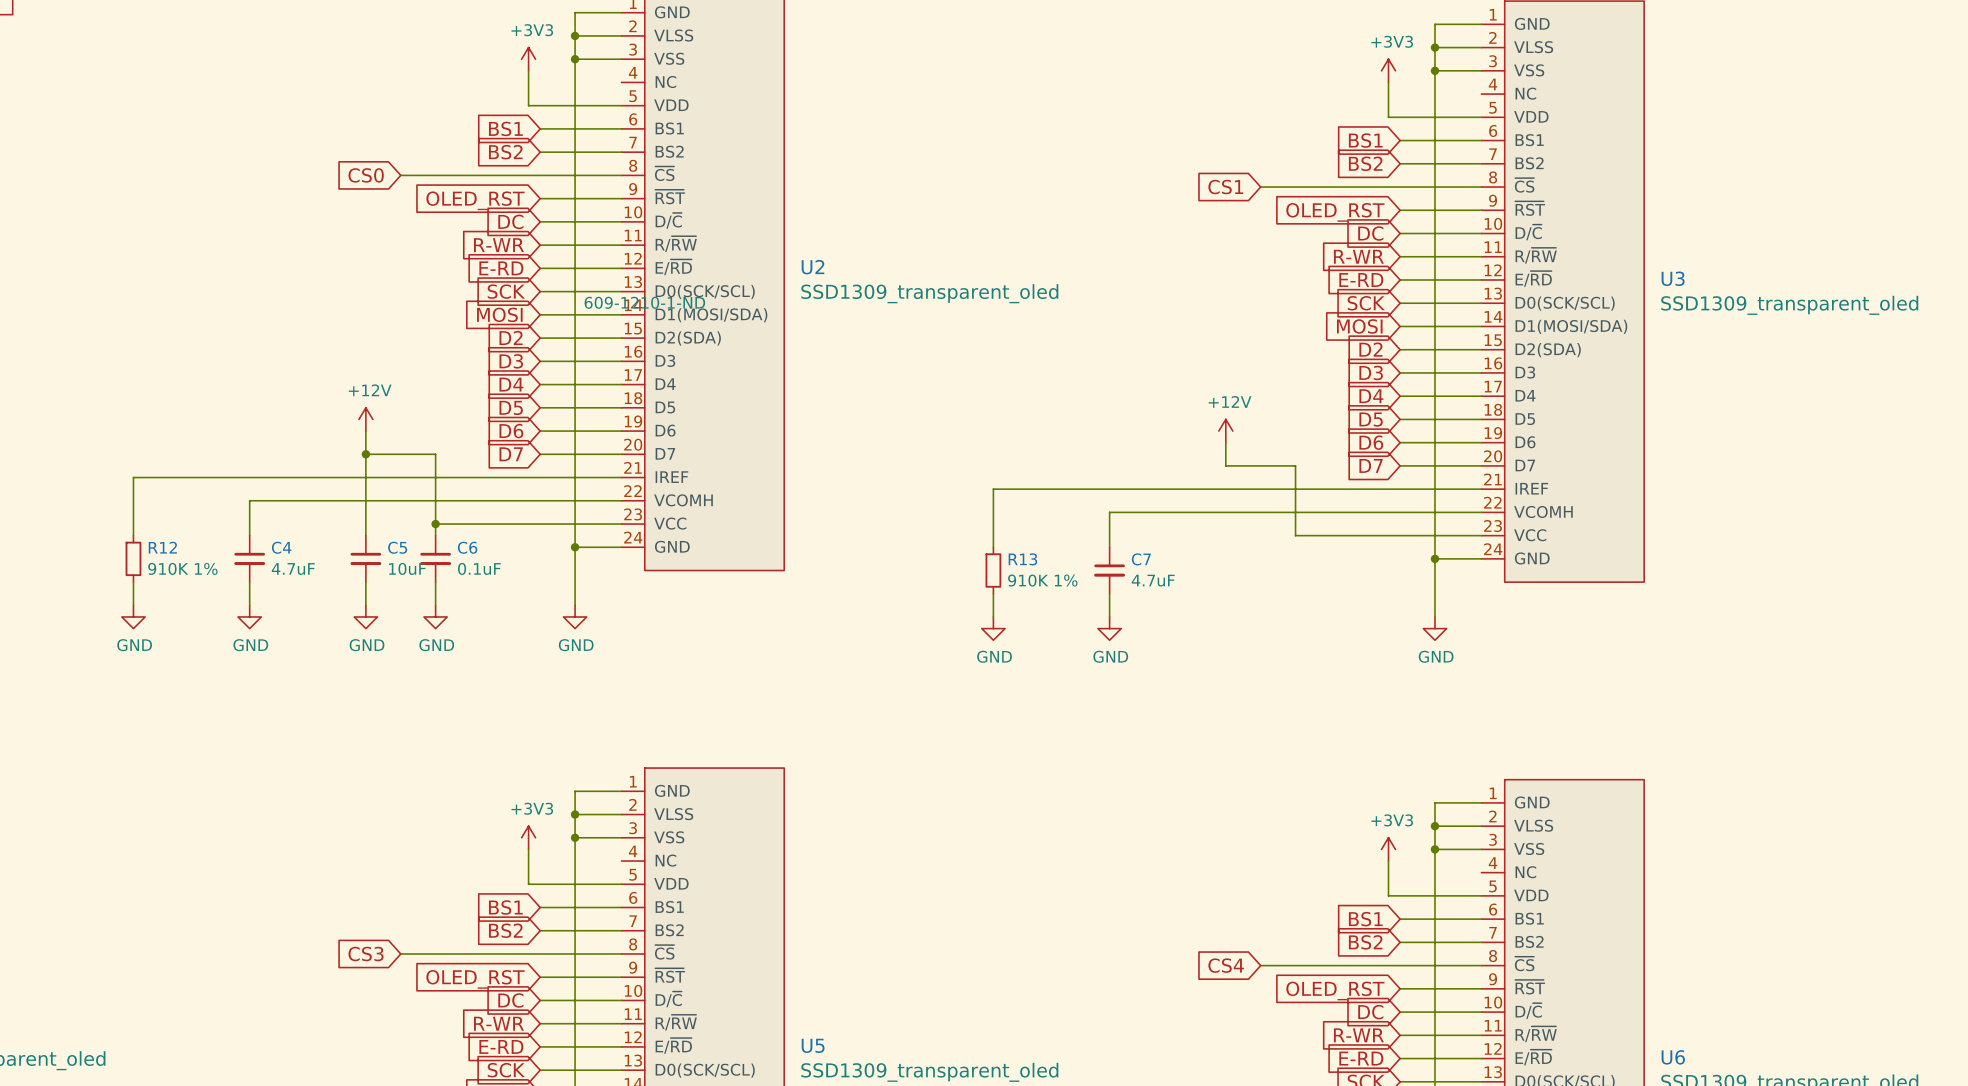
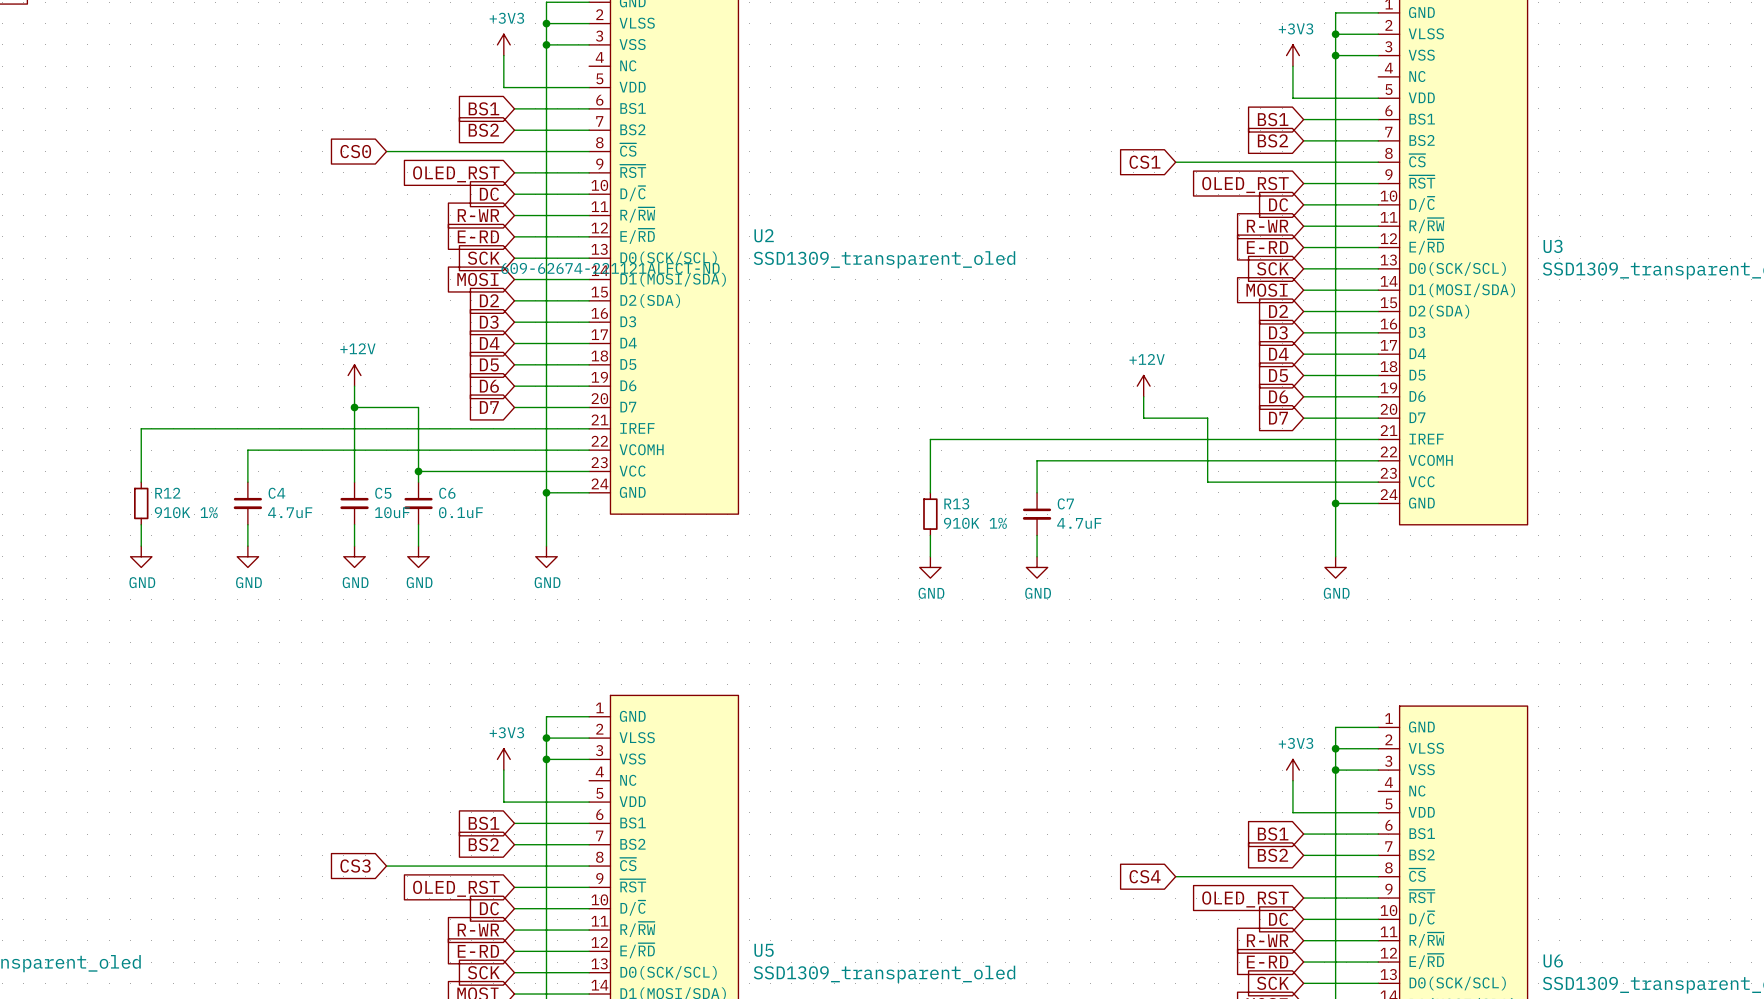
U2 text: 609-1210-1-ND (644, 302) -> 609-62674-221121ALFCT-ND (610, 268)

